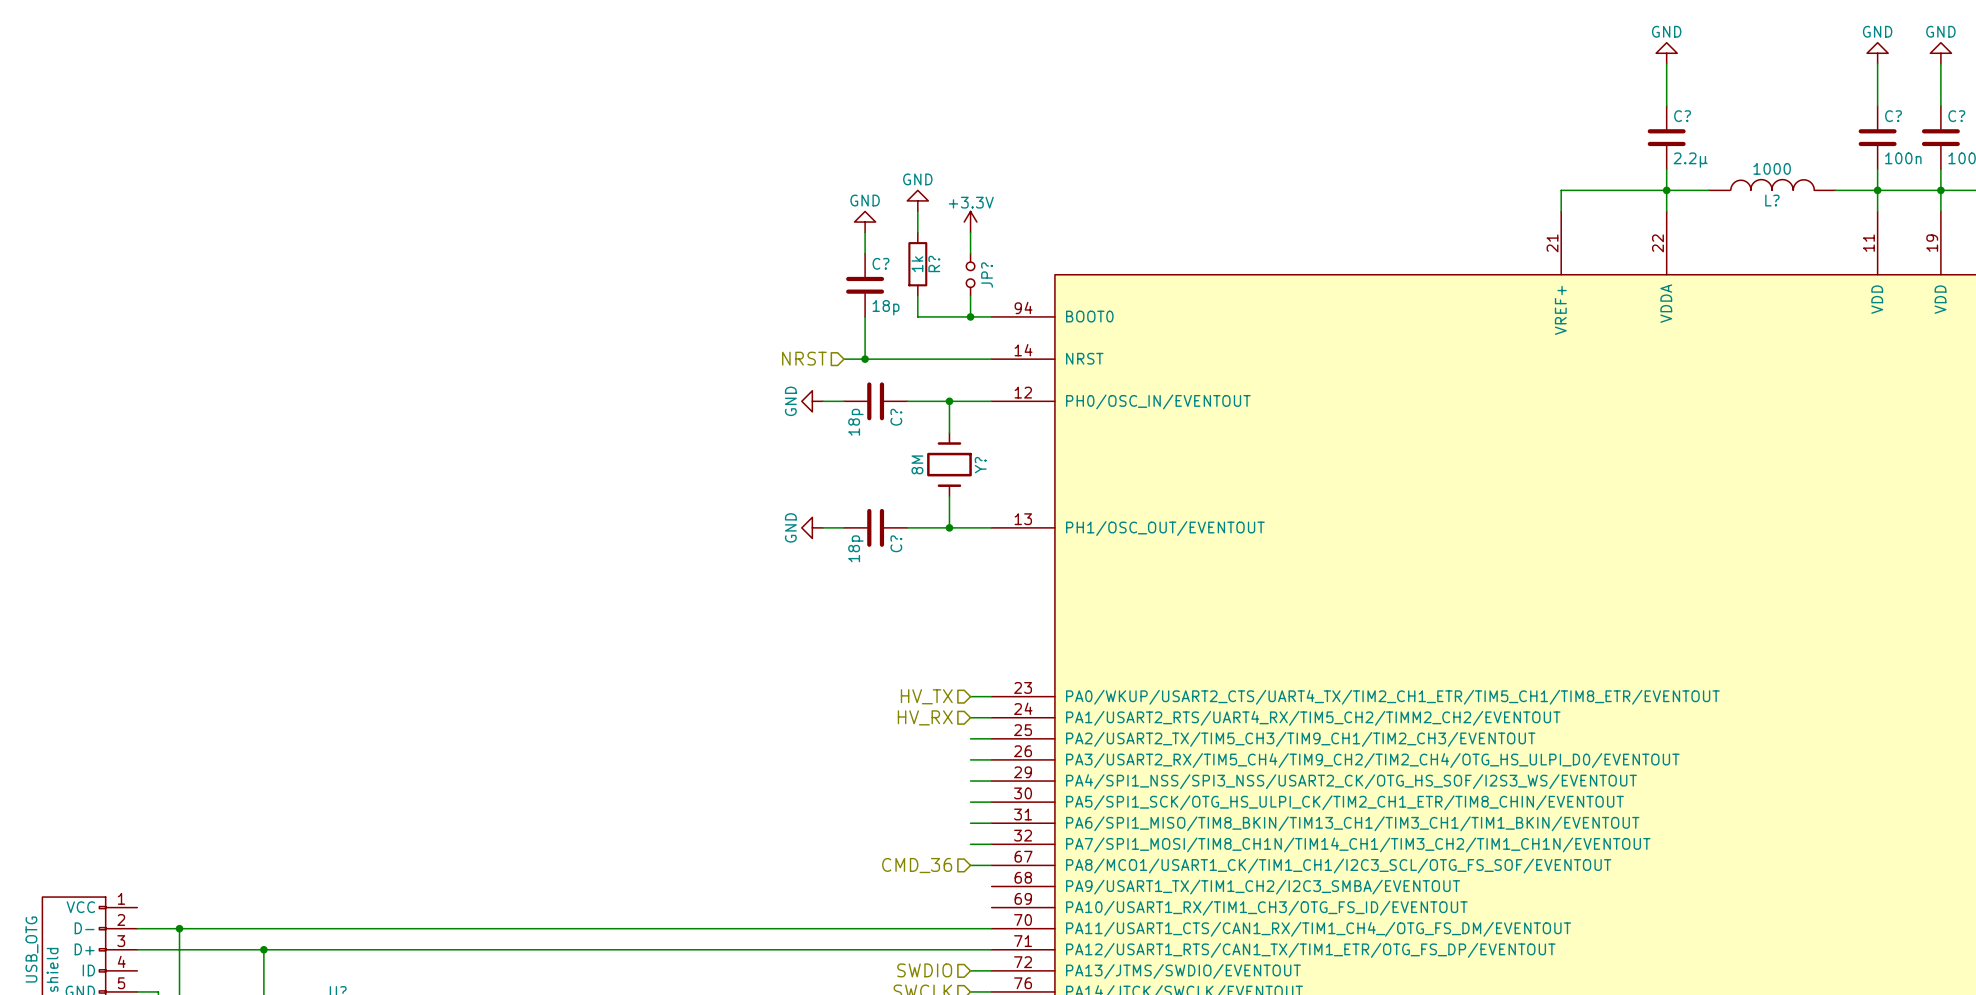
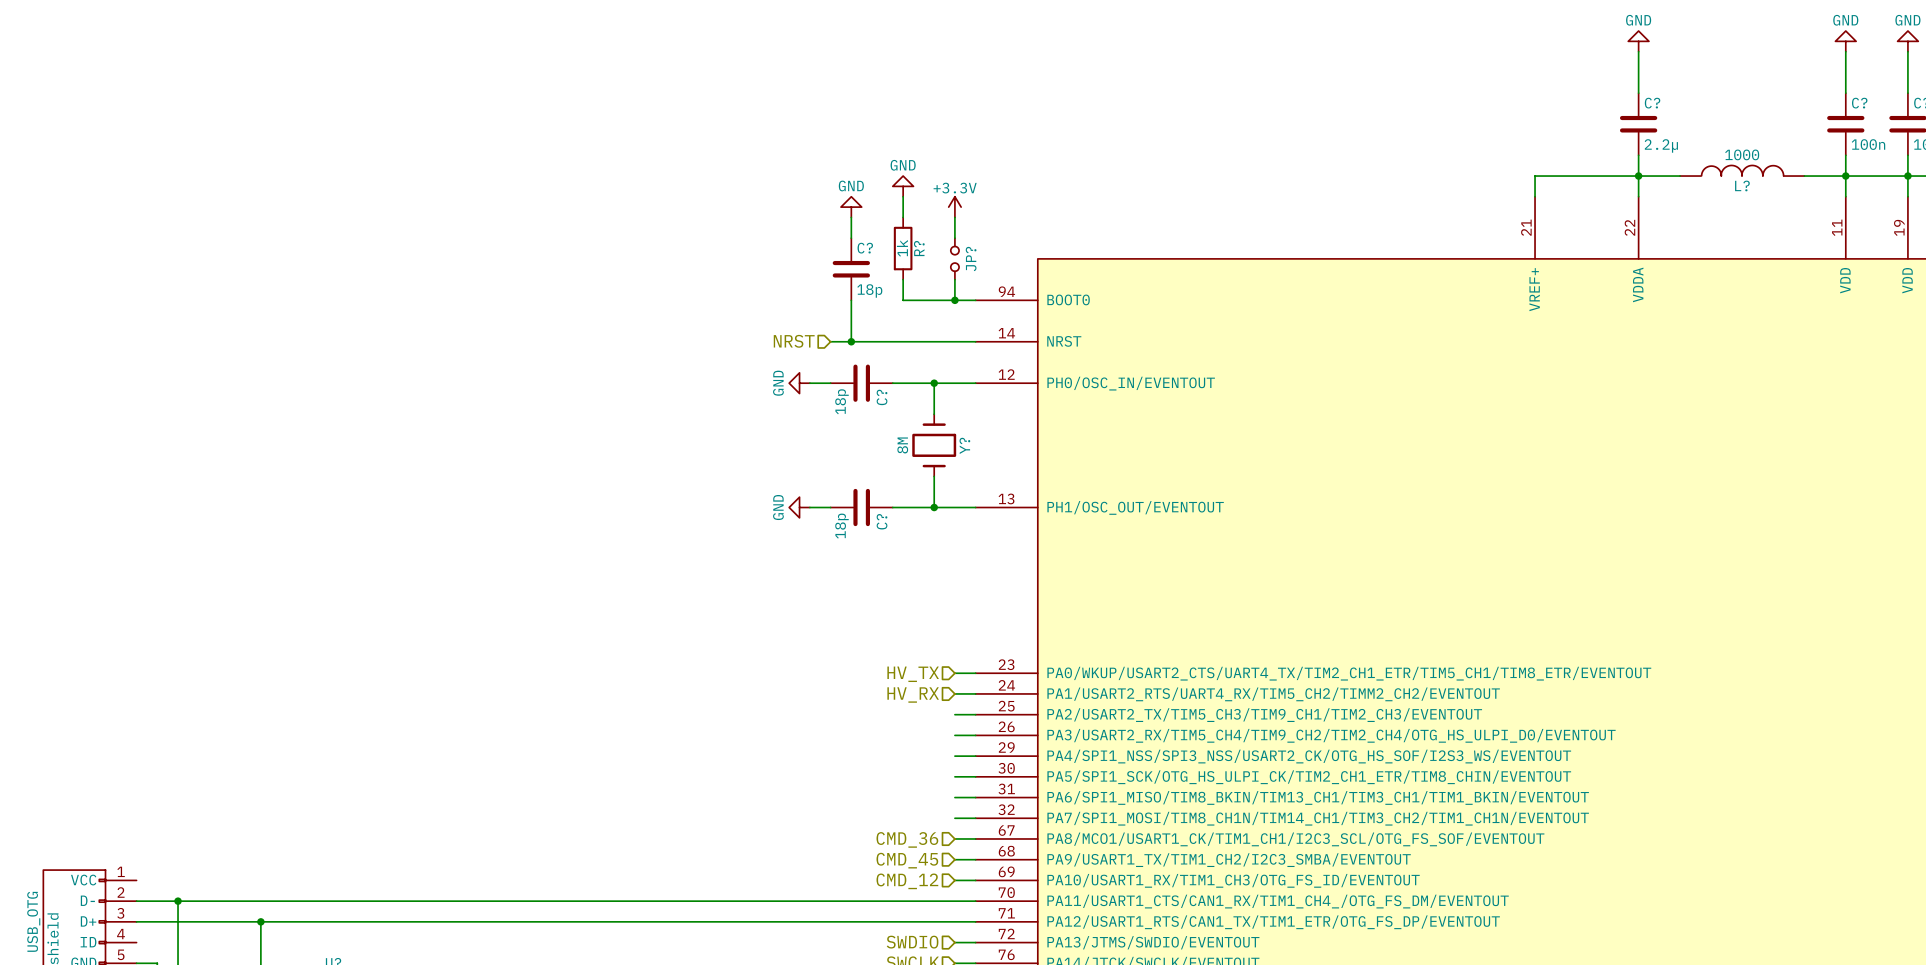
hierarchical label: none -> CMD_45 (907, 860)
wire: none -> (954, 859) (975, 859)
hierarchical label: none -> CMD_12 (907, 881)
wire: none -> (954, 880) (975, 880)

